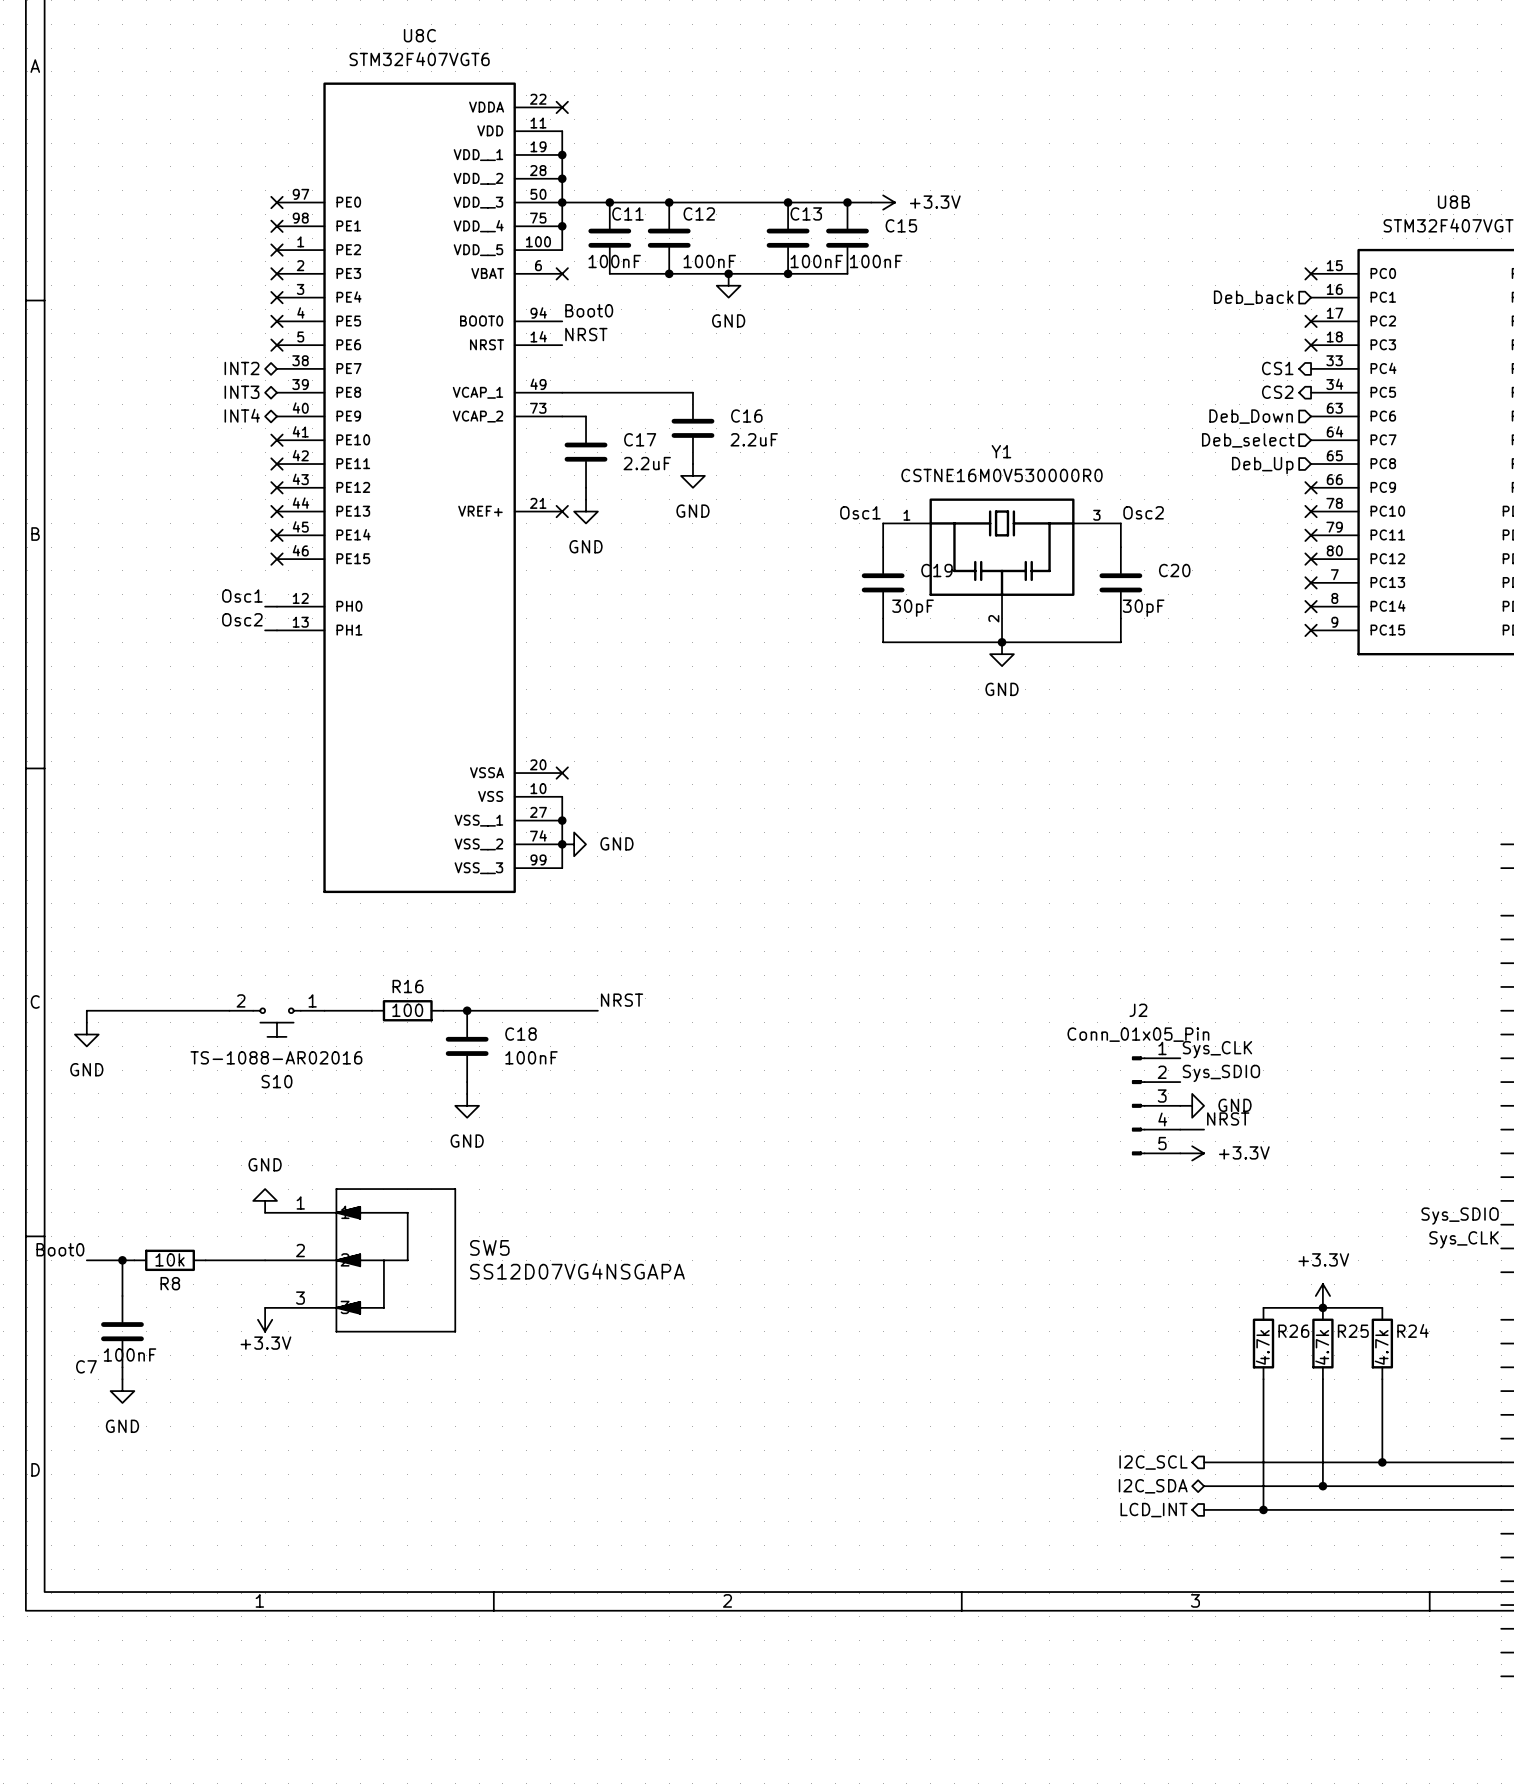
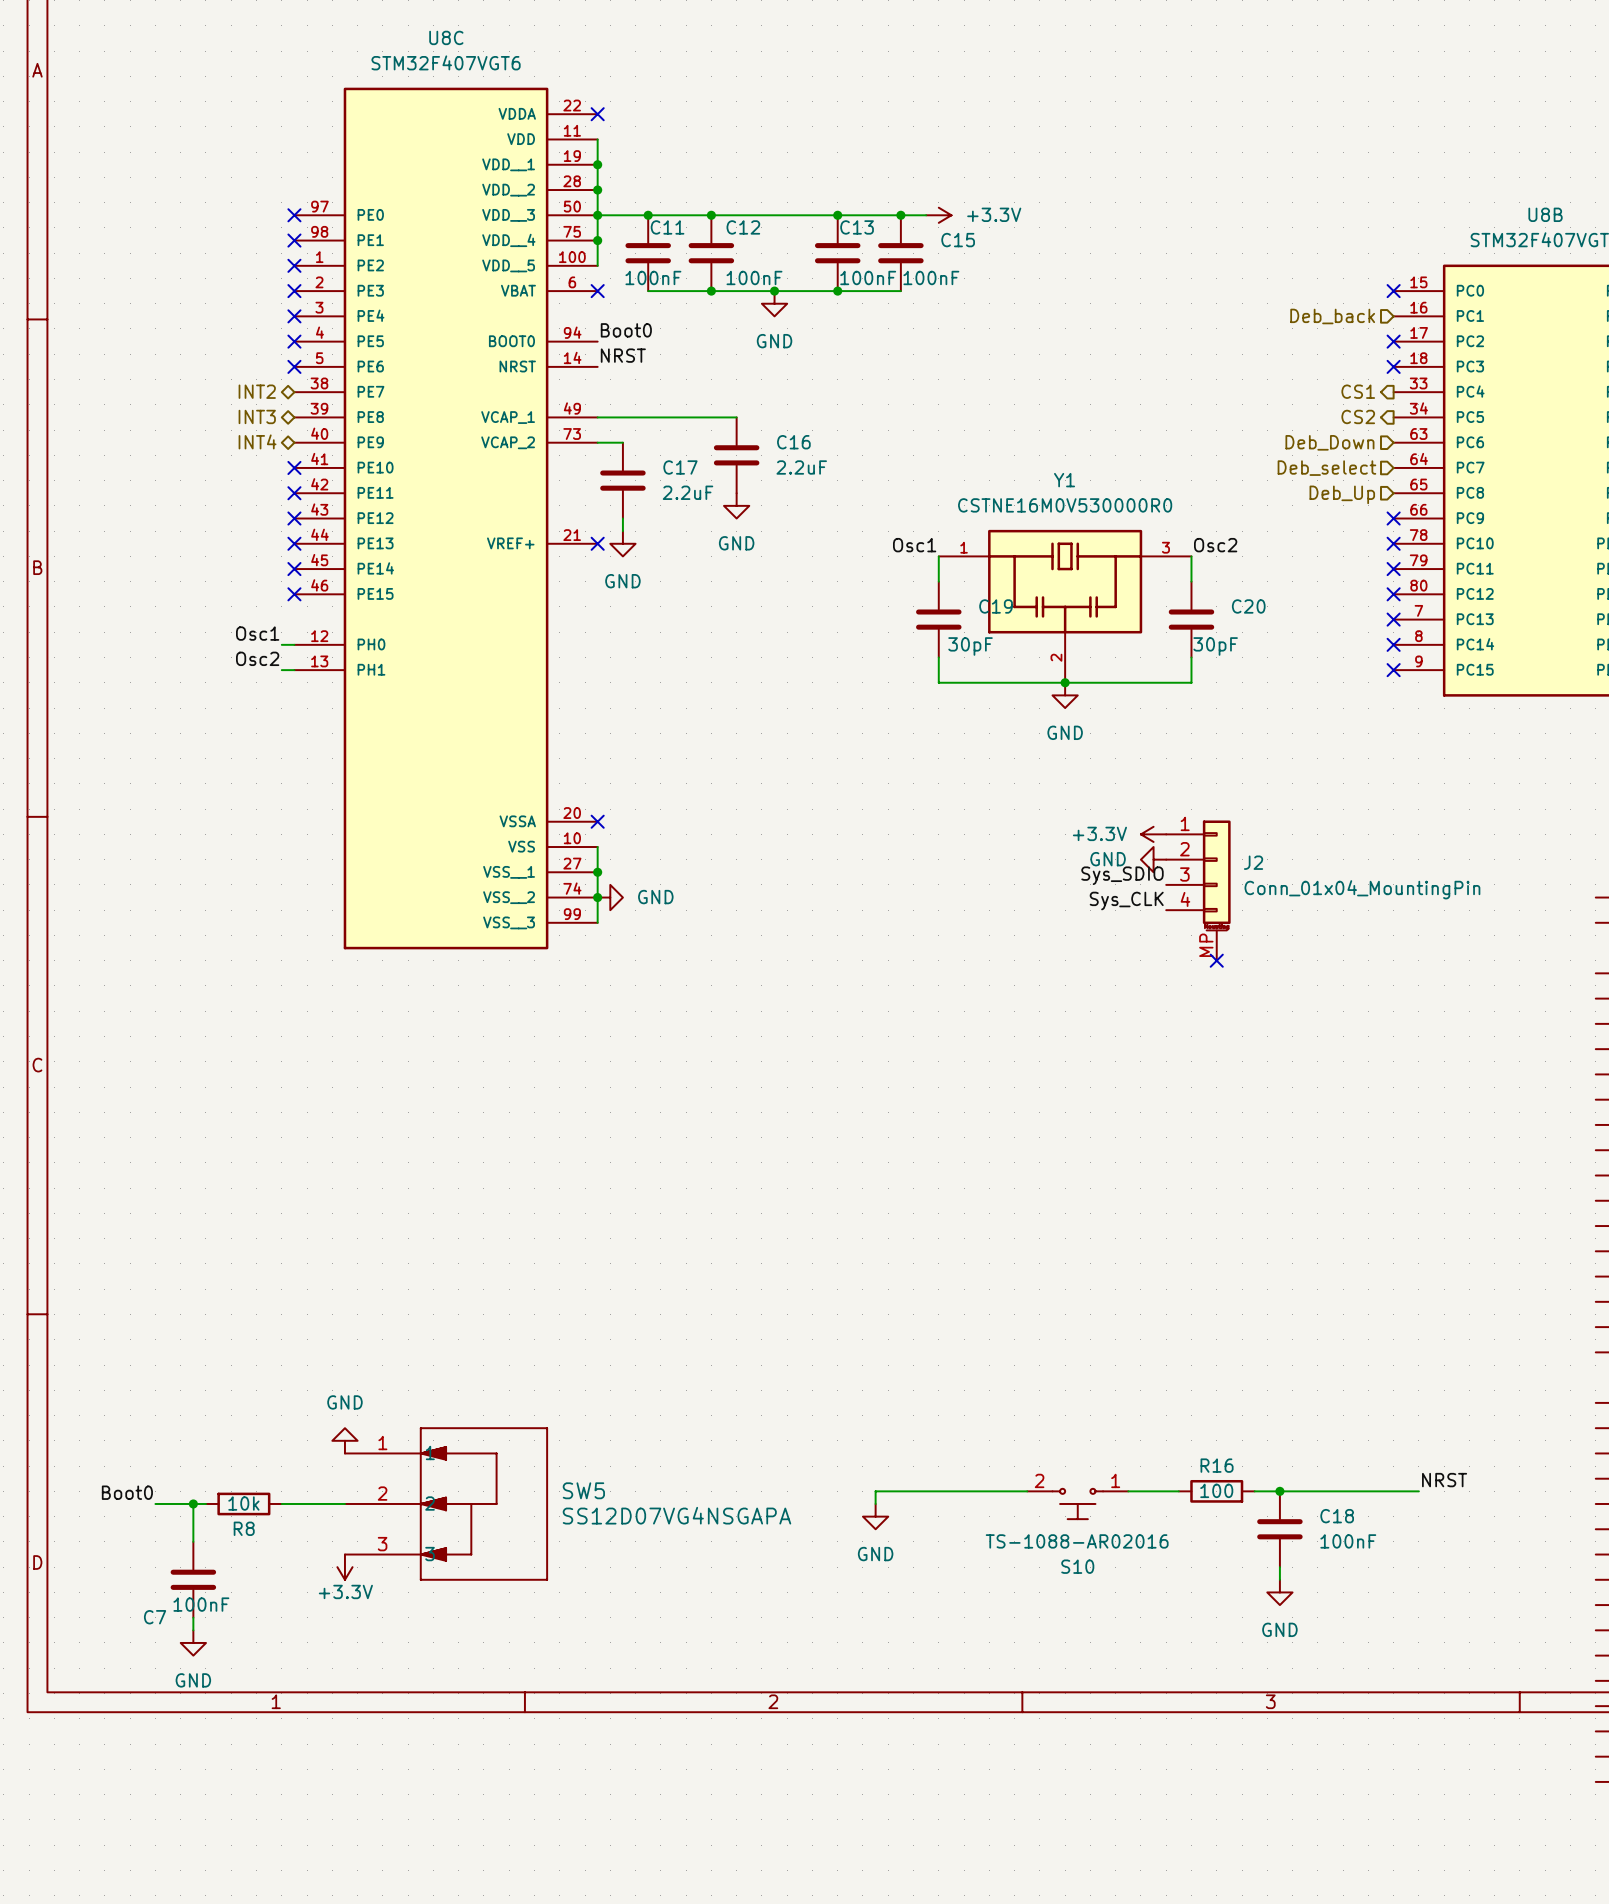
power symbol: none -> +3.3V (1153, 834)
power symbol: none -> GND (1153, 859)
label: none -> Sys_SDIO (1122, 875)
no-connect mark: none -> (1216, 960)
label: NRST (622, 1000) -> none
wire: (229, 1010) (86, 1010) (86, 1022) -> none
wire: (324, 1010) (372, 1010) -> none
R16 position: (407, 1010) -> (1216, 1491)
wire: (443, 1010) (597, 1010) -> none
junction: (467, 1010) -> none
J2 name position: J2 (1138, 1010) -> J2 (1253, 862)
S10 position: (276, 1022) -> (1077, 1503)
power symbol: GND (86, 1034) -> none
J2 value: Conn_01x05_Pin (1138, 1034) -> Conn_01x04_MountingPin (1362, 889)
C18 position: (467, 1046) -> (1279, 1529)
label position: Sys_CLK (1217, 1049) -> Sys_CLK (1126, 901)
J2 symbol: [1132, 1056, 1181, 1156] -> [1166, 820, 1231, 961]
label: Sys_SDIO (1221, 1073) -> none
wire: (467, 1082) (467, 1093) -> none
power symbol: GND (467, 1105) -> none
power symbol: GND (1192, 1105) -> none
label: NRST (1228, 1118) -> none
wire: (1180, 1129) (1204, 1129) -> none
power symbol: +3.3V (1192, 1153) -> none
power symbol: GND (265, 1200) -> none
label: Sys_SDIO (1460, 1216) -> none
label: Sys_CLK (1464, 1239) -> none
label position: Boot0 (60, 1249) -> Boot0 (127, 1492)
wire: (86, 1260) (134, 1260) -> (155, 1503) (205, 1503)
wire: (122, 1260) (122, 1296) -> (193, 1503) (193, 1541)
junction: (122, 1260) -> none
R8 position: (170, 1260) -> (243, 1503)
wire: (205, 1260) (265, 1260) -> (281, 1503) (344, 1503)
SW5 position: (360, 1260) -> (446, 1503)
power symbol: +3.3V (1322, 1296) -> none
wire: (1263, 1307) (1382, 1307) -> none
junction: (1322, 1307) -> none
power symbol position: +3.3V (265, 1319) -> +3.3V (344, 1567)
C7 position: (122, 1331) -> (193, 1579)
R26: 4.7k (1263, 1343) -> none
R25: 4.7k (1322, 1343) -> none
R24: 4.7k (1382, 1343) -> none
power symbol: none -> GND (344, 1440)
wire: (122, 1367) (122, 1379) -> (193, 1617) (193, 1630)
wire: (1263, 1379) (1263, 1509) -> none
wire: (1322, 1379) (1322, 1486) -> none
wire: (1382, 1379) (1382, 1462) -> none
power symbol: GND (122, 1391) -> none
label: none -> NRST (1444, 1480)
wire: none -> (1027, 1491) (875, 1491) (875, 1503)
wire: none -> (1128, 1491) (1178, 1491)
wire: none -> (1254, 1491) (1418, 1491)
junction: none -> (1279, 1491)
junction: none -> (193, 1503)
power symbol: none -> GND (875, 1516)
hierarchical label: I2C_SCL (1153, 1462) -> none
wire: (1204, 1462) (1501, 1462) -> none
junction: (1382, 1462) -> none
hierarchical label: I2C_SDA (1153, 1486) -> none
wire: (1204, 1486) (1501, 1486) -> (1279, 1579) (1279, 1567)
junction: (1322, 1486) -> none
power symbol: none -> GND (1279, 1592)
wire: (1204, 1509) (1501, 1509) -> none
junction: (1263, 1509) -> none
hierarchical label: LCD_INT (1154, 1510) -> none
power symbol: none -> GND (193, 1642)

